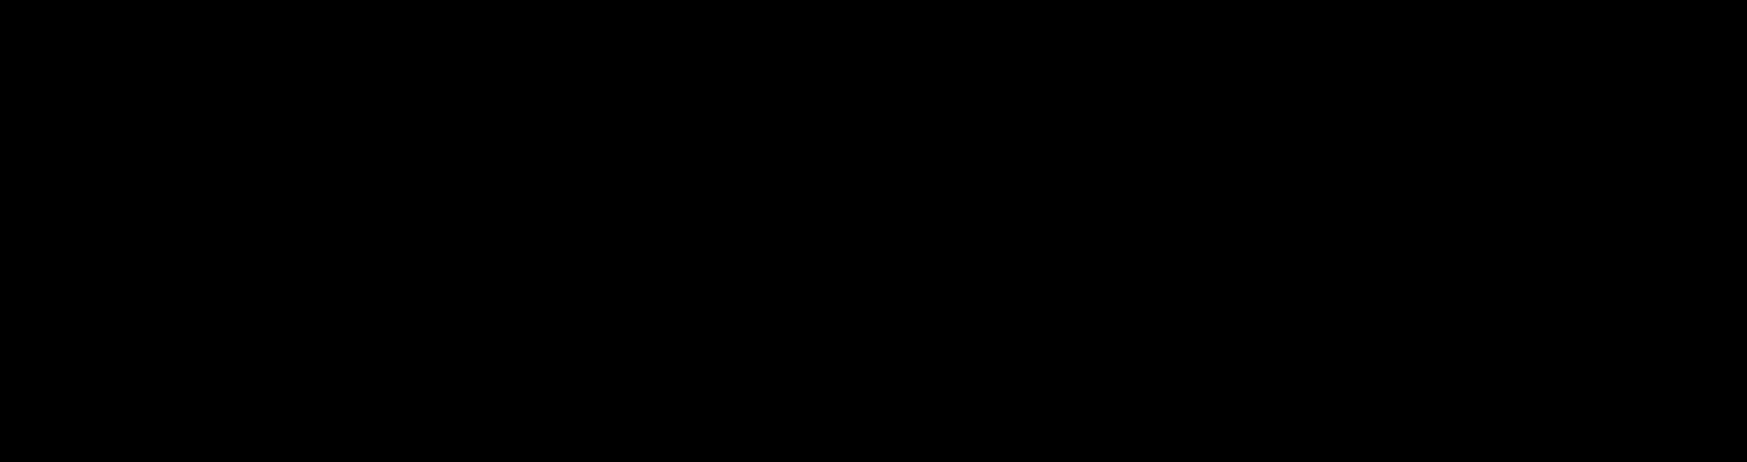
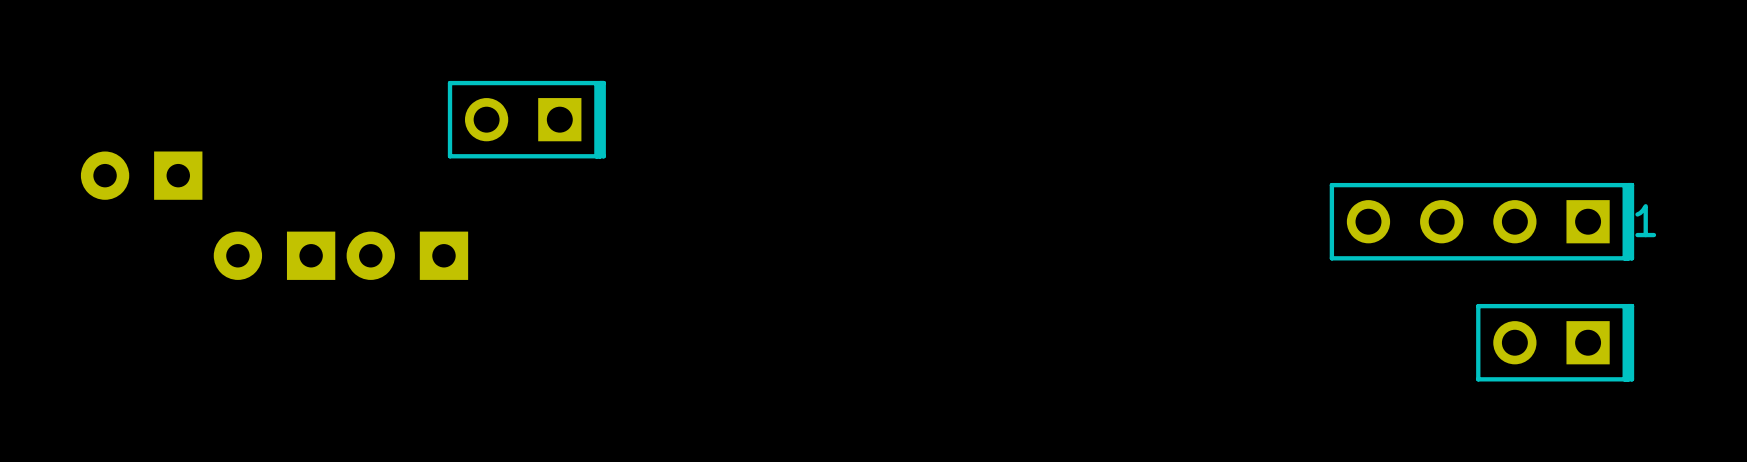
part: none -> (526, 119)
part: none -> (141, 175)
part: none -> (1481, 221)
part: none -> (274, 255)
part: none -> (407, 255)
part: none -> (1555, 342)

